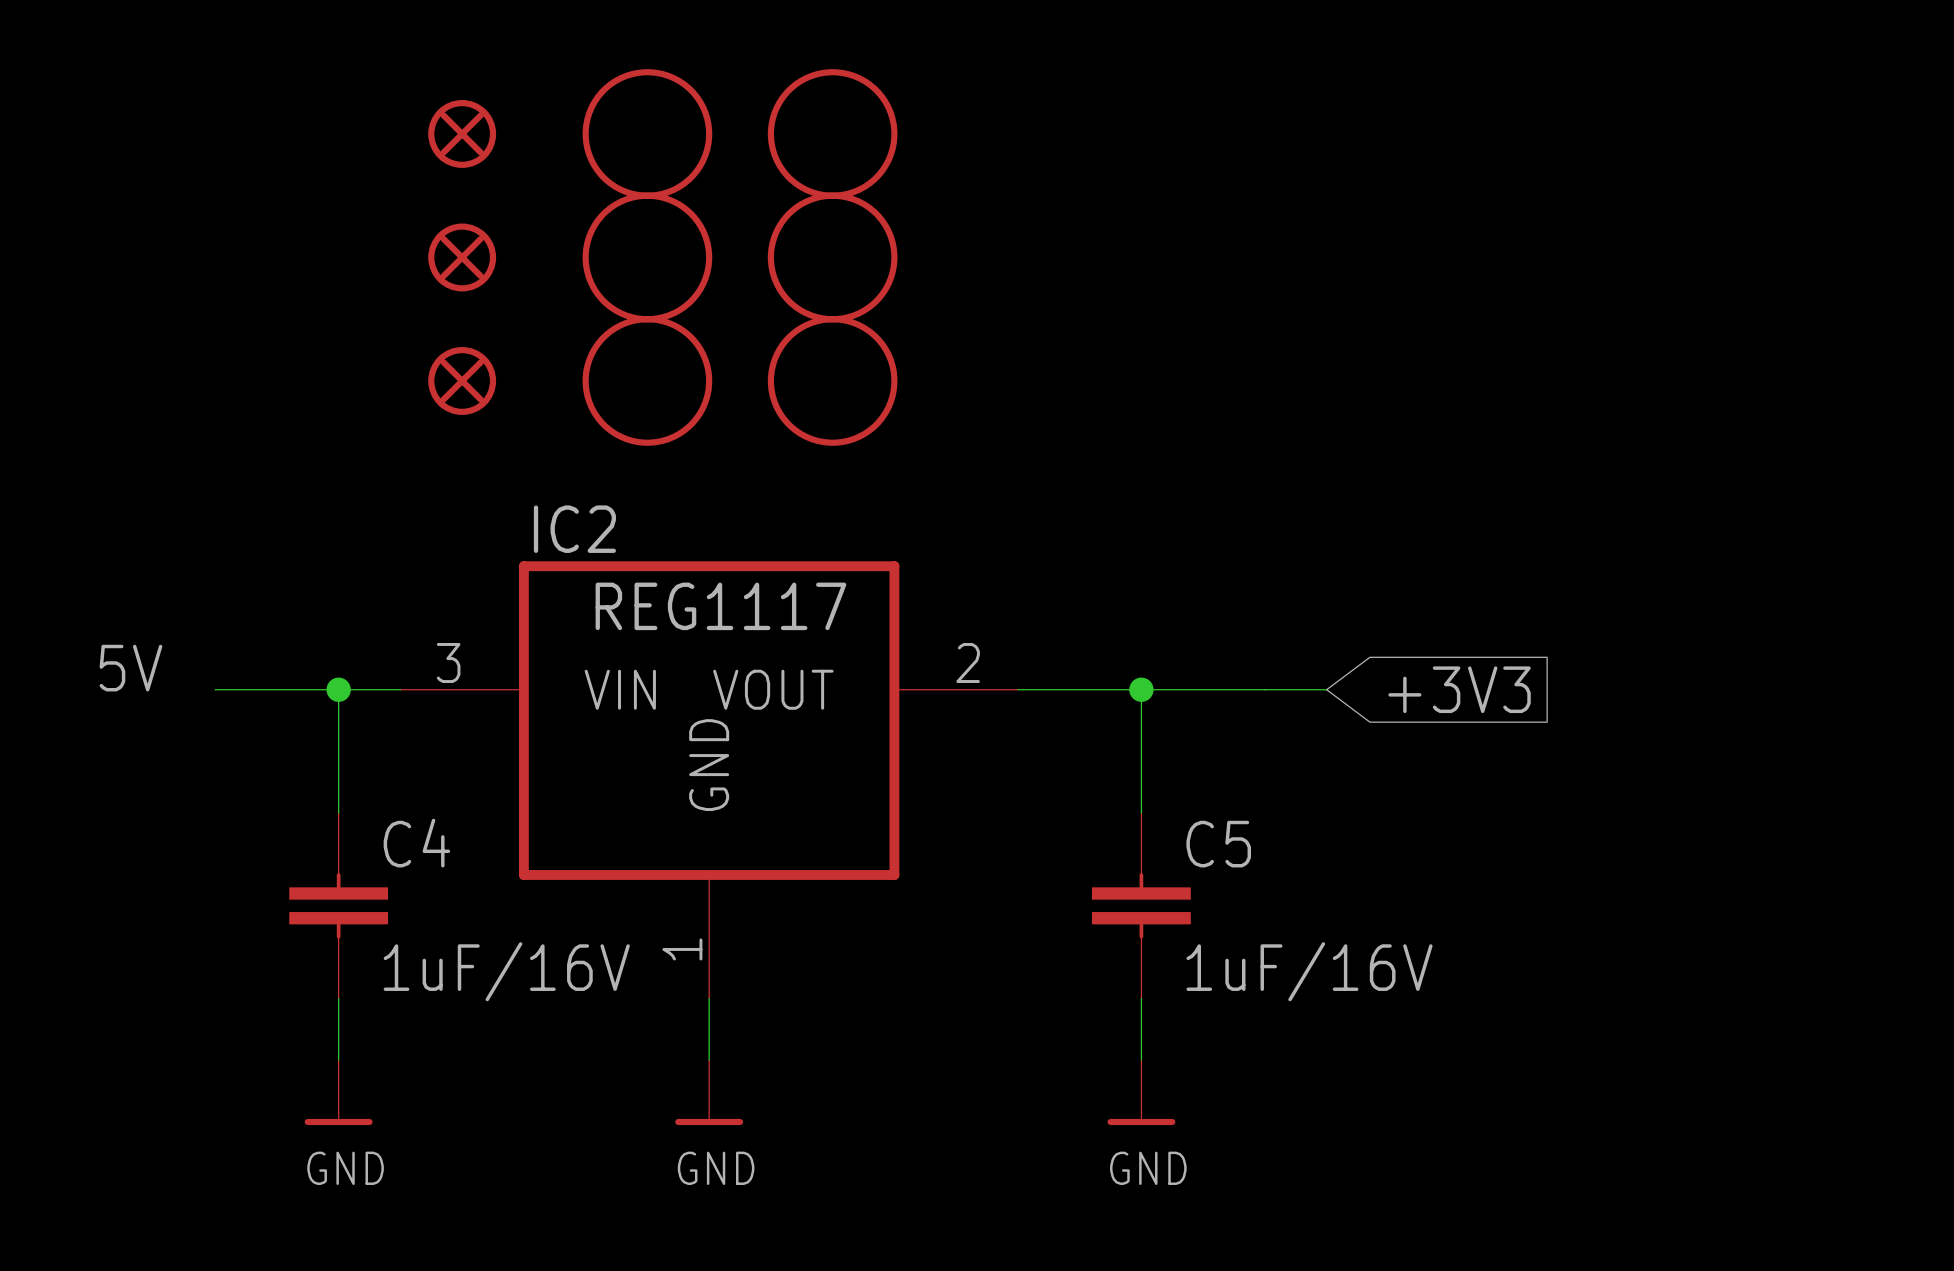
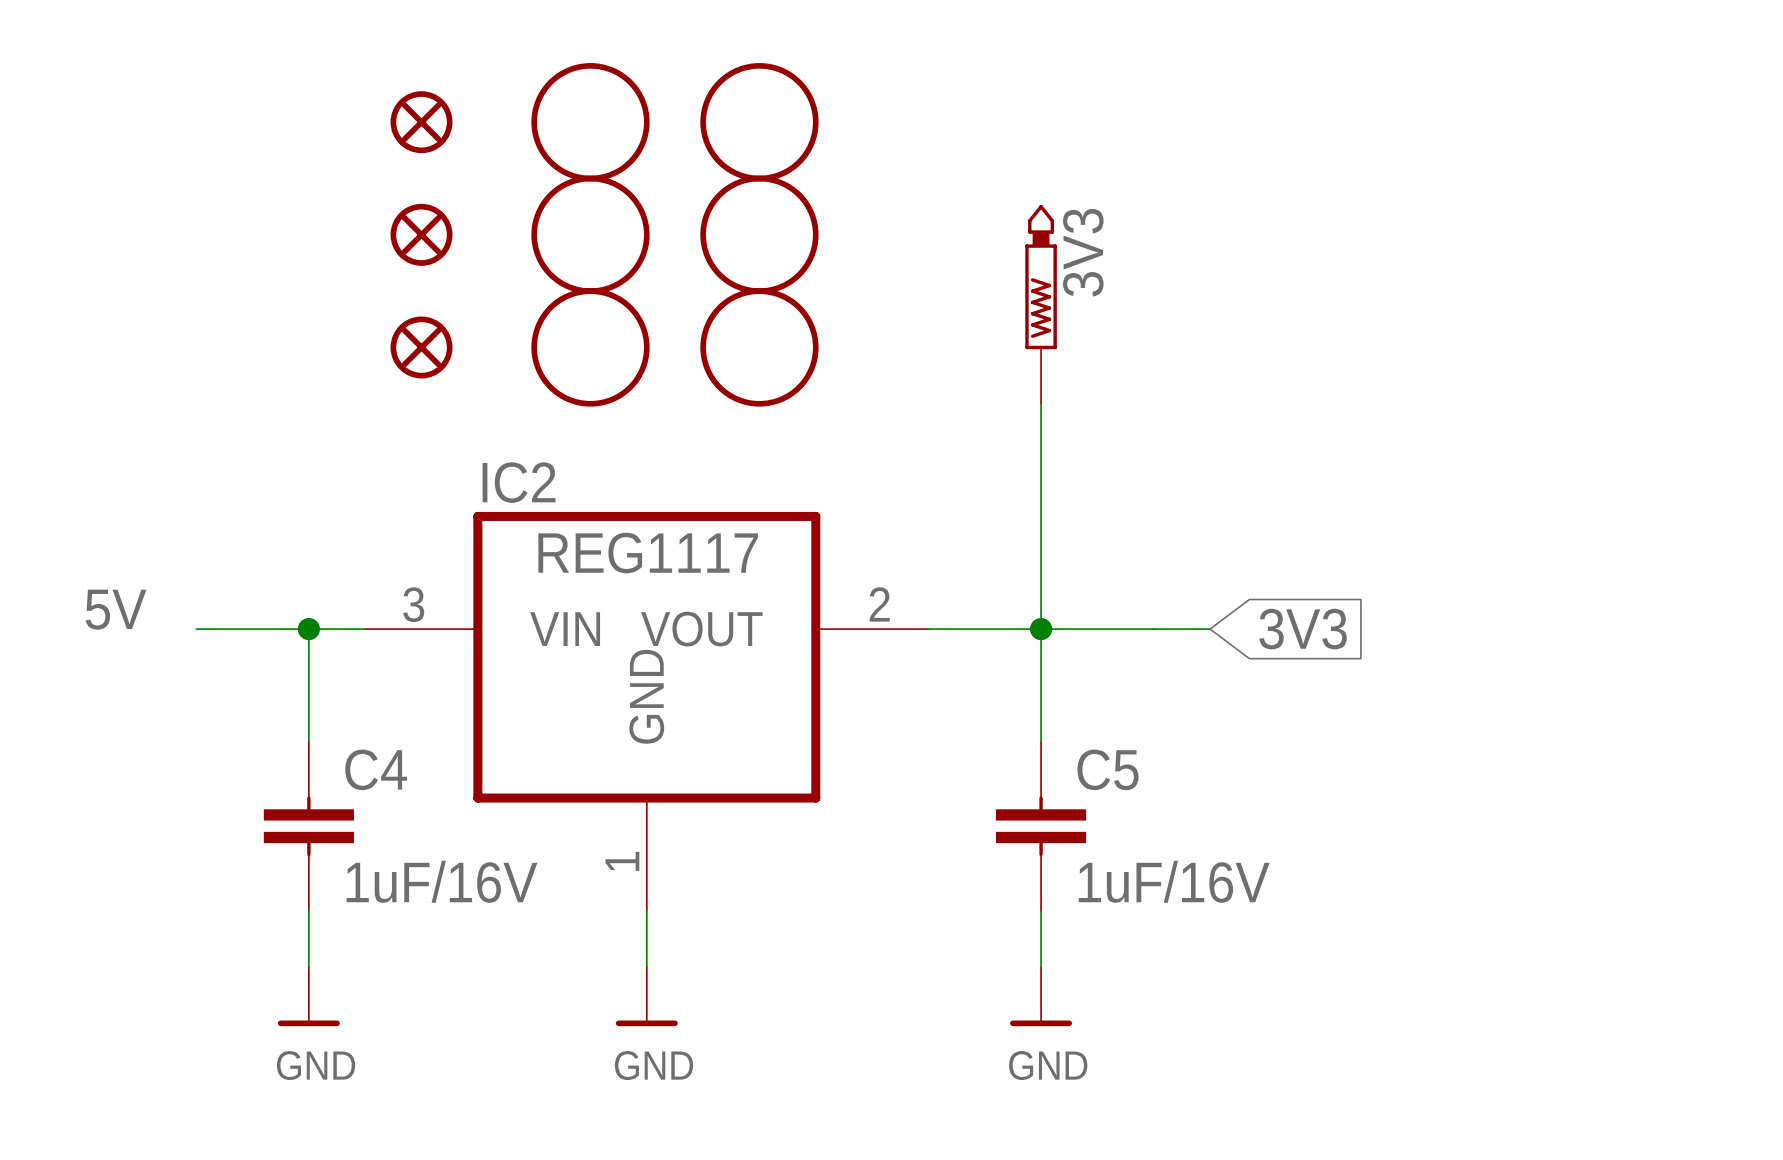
3V3: none -> (1041, 304)
wire: none -> (1041, 403) (1041, 629)
global label: +3V3 (1459, 689) -> 3V3 (1303, 629)

